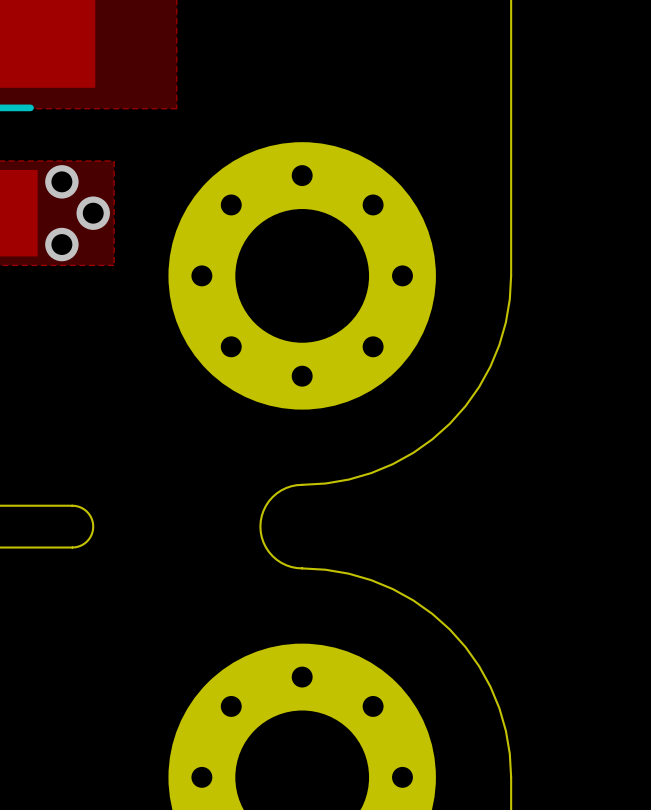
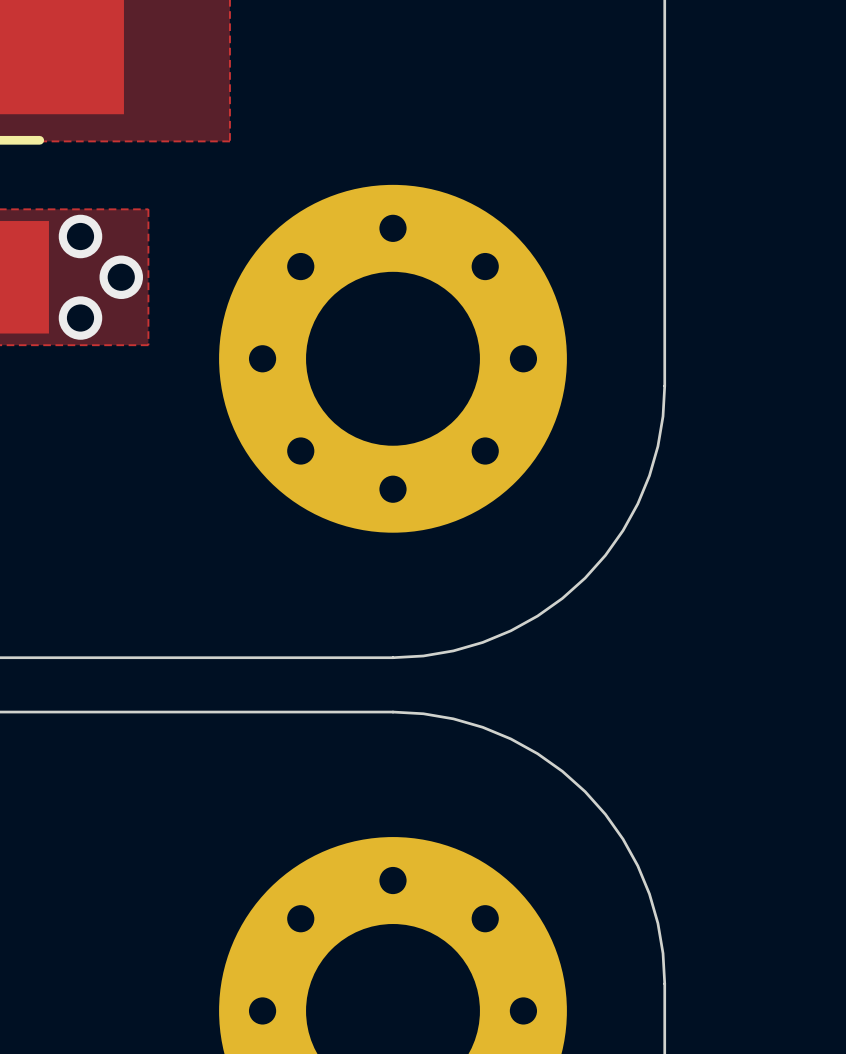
board edge: (511, 275) (509, 299) (499, 344) (479, 387) (449, 423) (413, 452) (371, 473) (325, 483) (296, 485) (281, 490) (265, 505) (260, 526) (265, 547) (281, 562) (296, 568) (325, 569) (371, 580) (413, 600) (449, 629) (479, 666) (499, 708) (509, 753) (511, 777) -> (664, 358) (663, 416) (657, 446) (649, 475) (637, 503) (623, 530) (605, 555) (585, 578) (562, 598) (537, 616) (510, 630) (482, 642) (453, 650) (423, 655) (392, 657) (94, 657)
board edge: (72, 505) (80, 507) (87, 511) (91, 518) (93, 526) (91, 534) (87, 541) (80, 545) (72, 547) -> (664, 1010) (663, 953) (657, 923) (649, 894) (637, 865) (623, 839) (605, 814) (585, 791) (562, 771) (537, 753) (510, 738) (482, 727) (453, 718) (423, 713) (392, 712) (94, 712)

